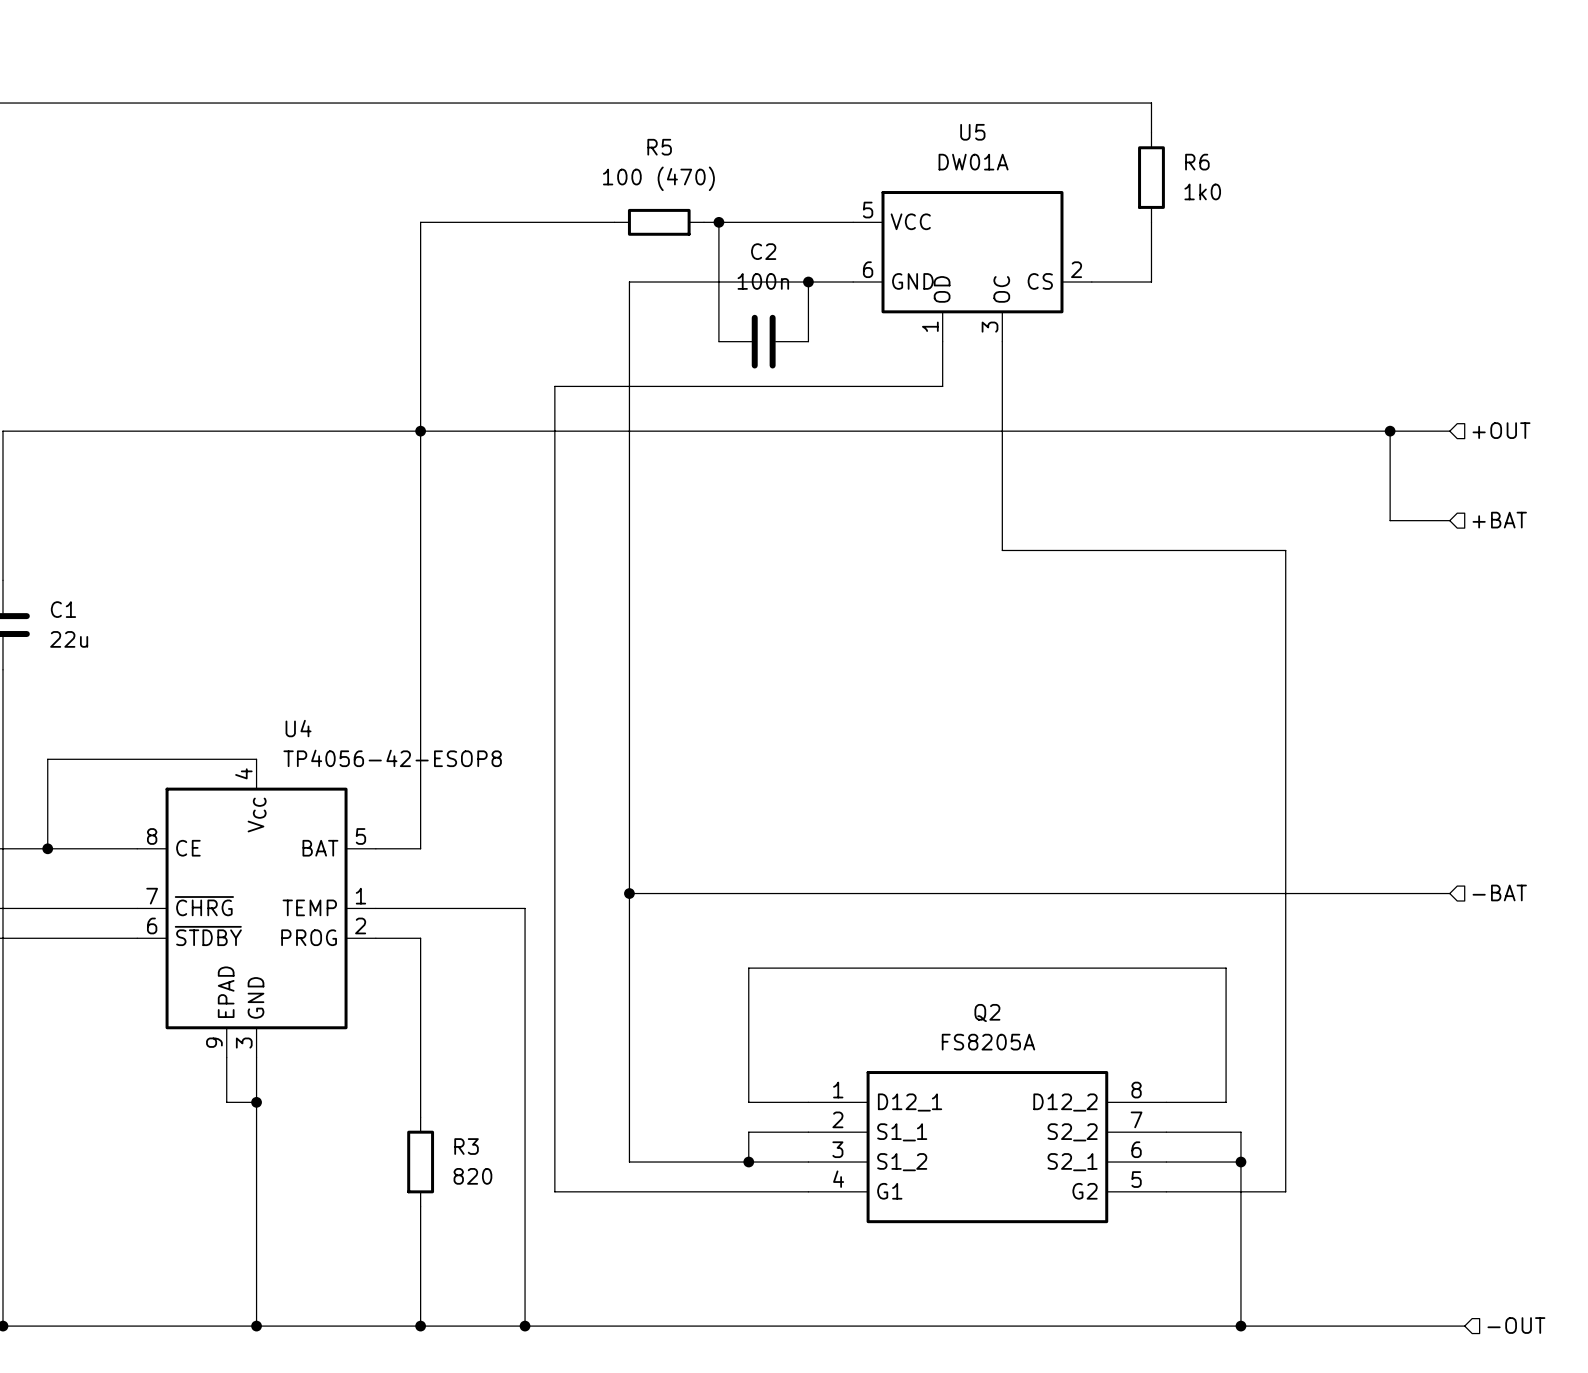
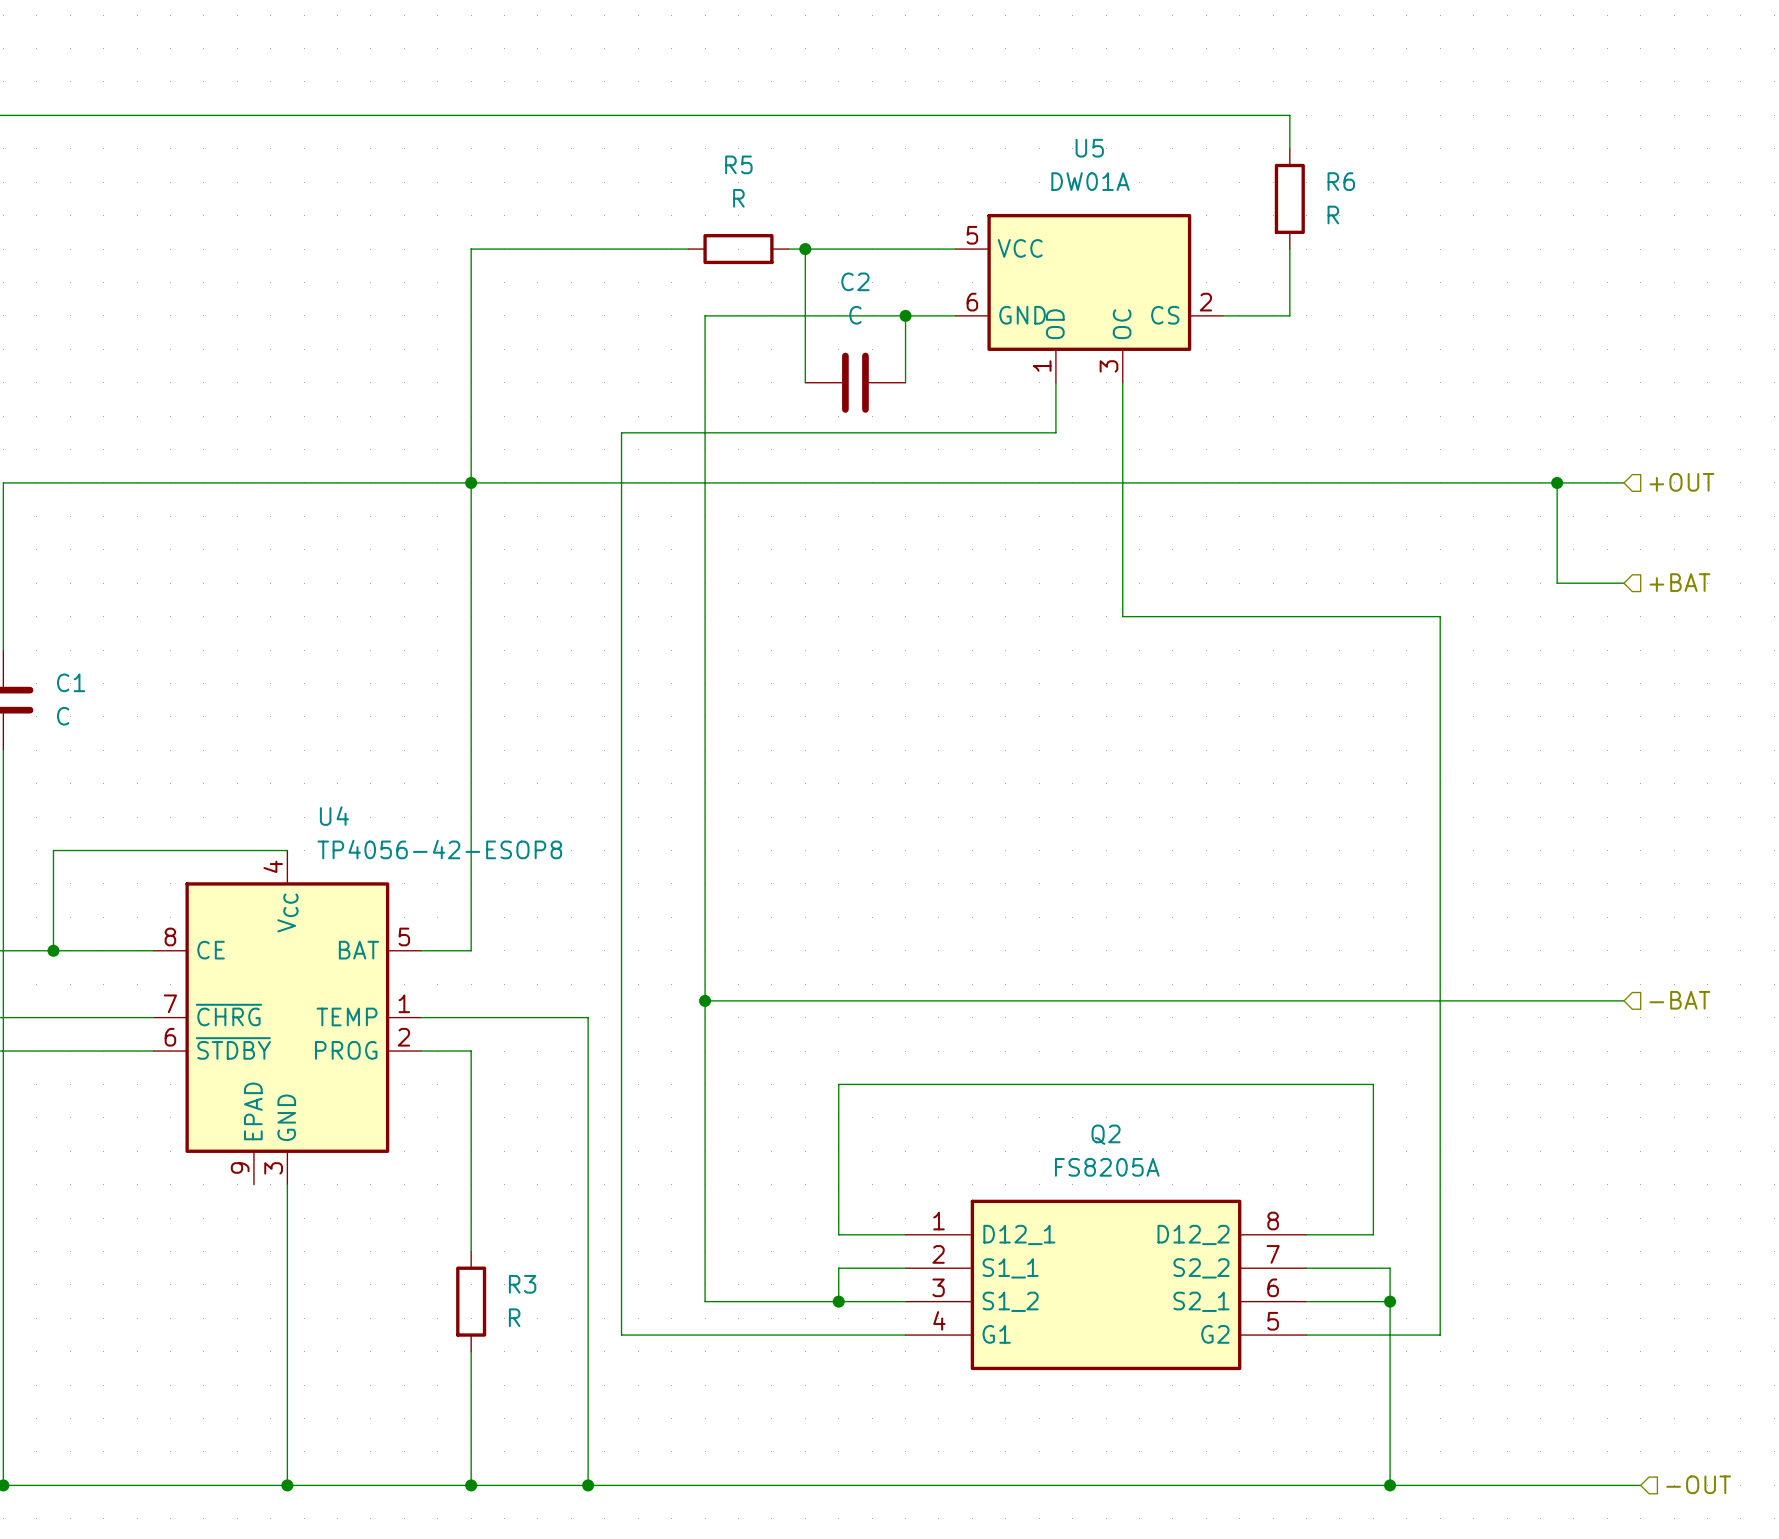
R5 value: 100 (470) (658, 178) -> R (738, 198)
R6 value: 1k0 (1202, 191) -> R (1333, 215)
C2 value: 100n (763, 281) -> C (855, 315)
C1 value: 22u (69, 639) -> C (63, 716)
wire: (226, 1057) (226, 1102) (256, 1102) -> none
junction: (256, 1102) -> none
R3 value: 820 (472, 1176) -> R (514, 1317)

